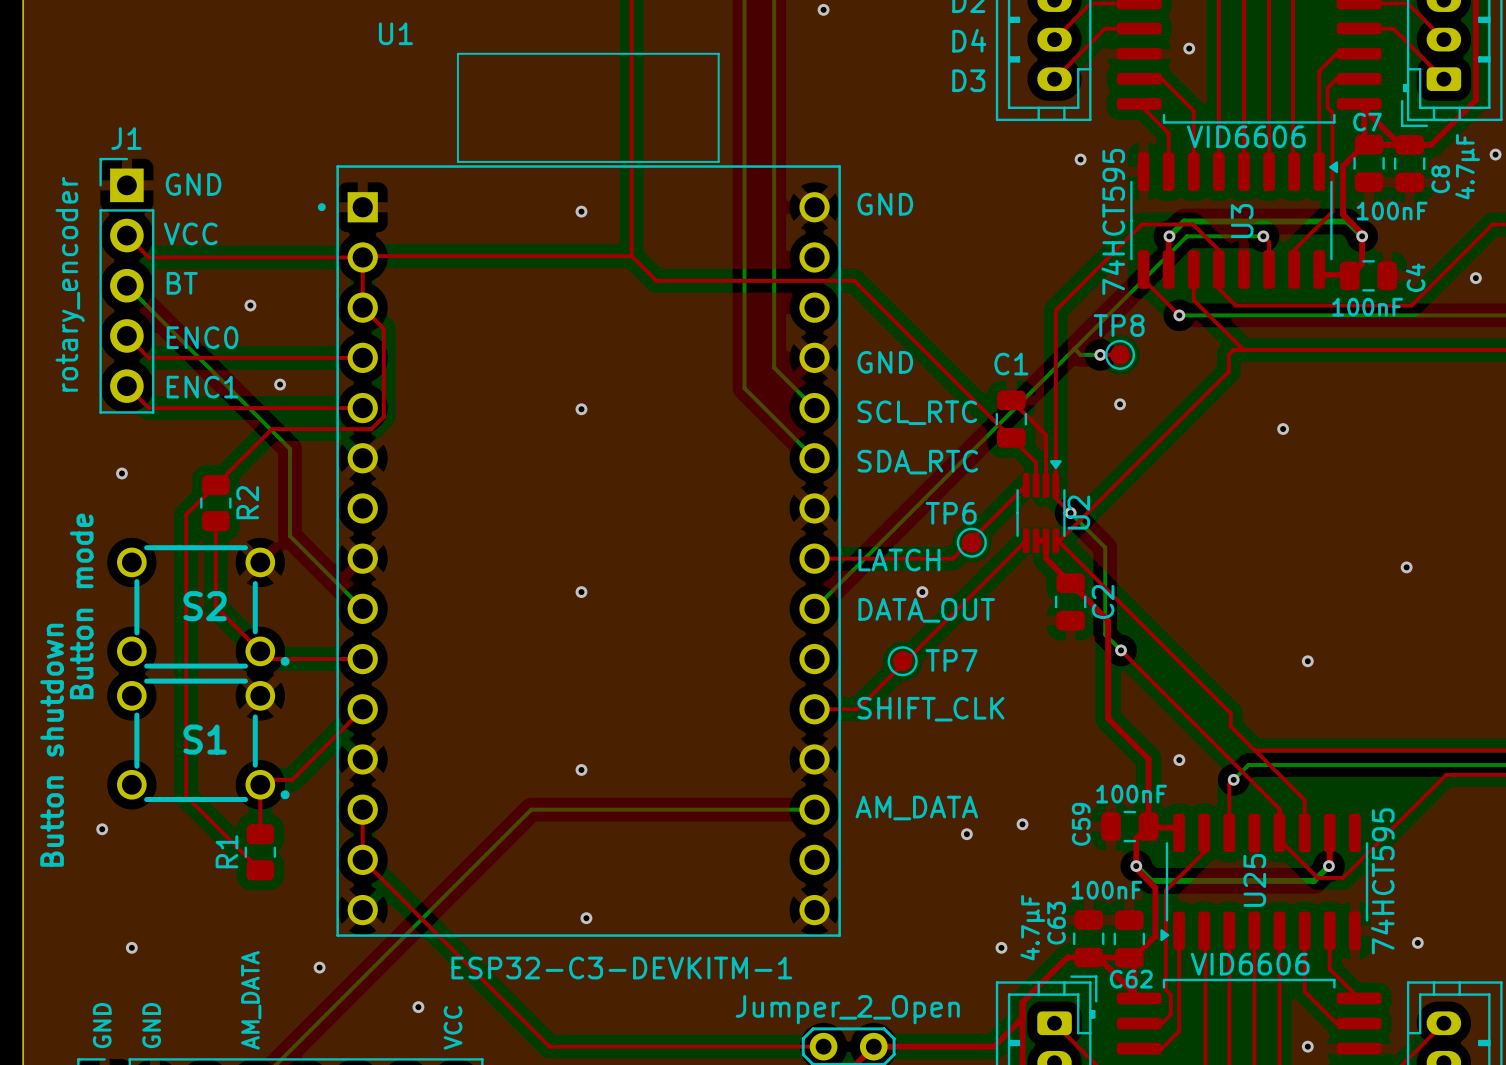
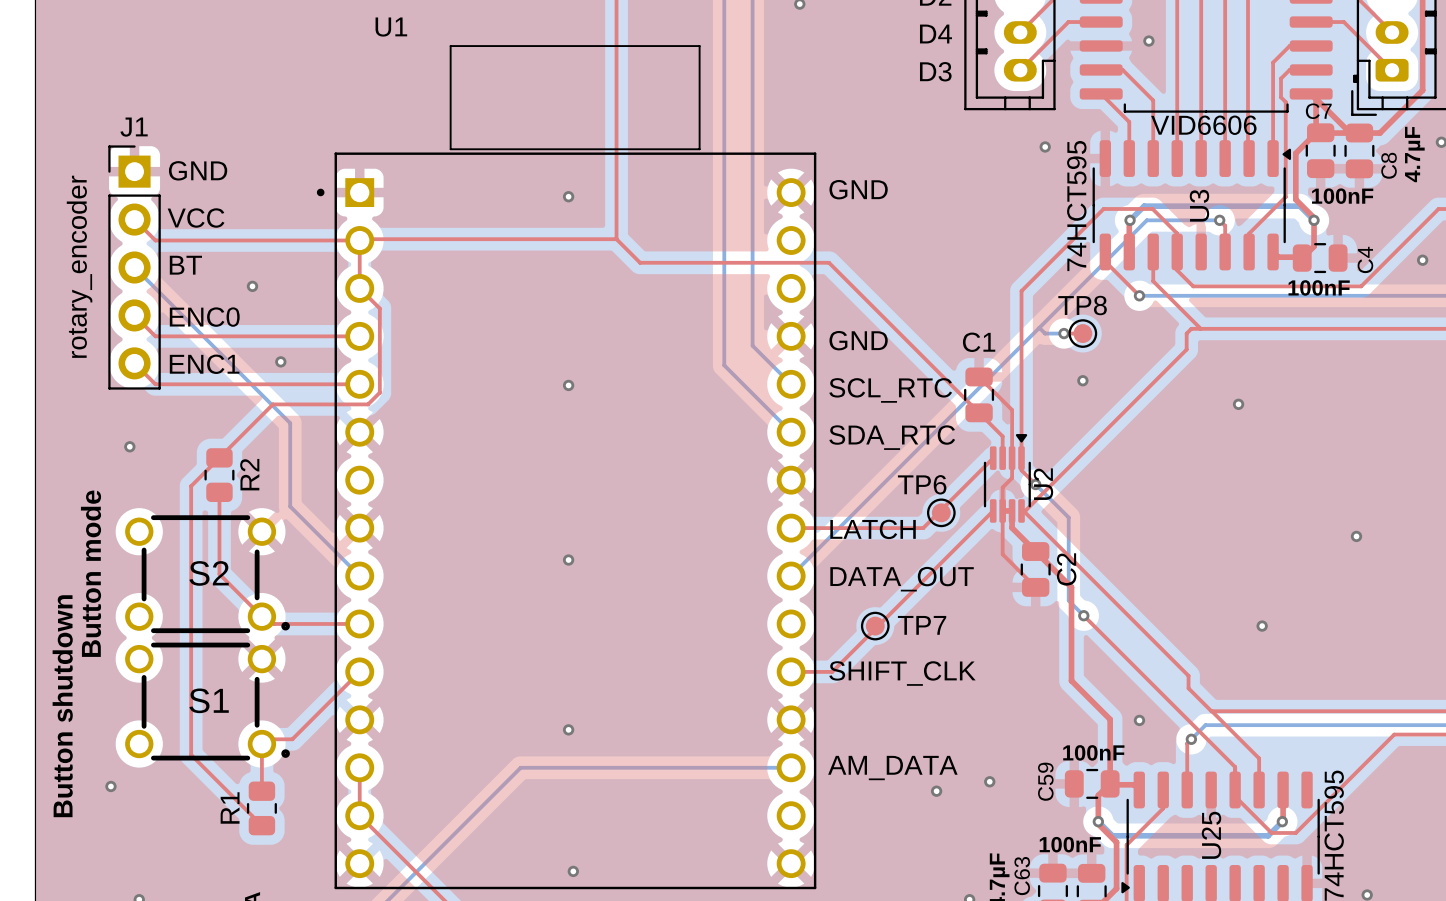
top track: none -> (1012, 458) (1012, 478) (1002, 487) (1002, 554) (1035, 587)
via: (922, 592) -> none

